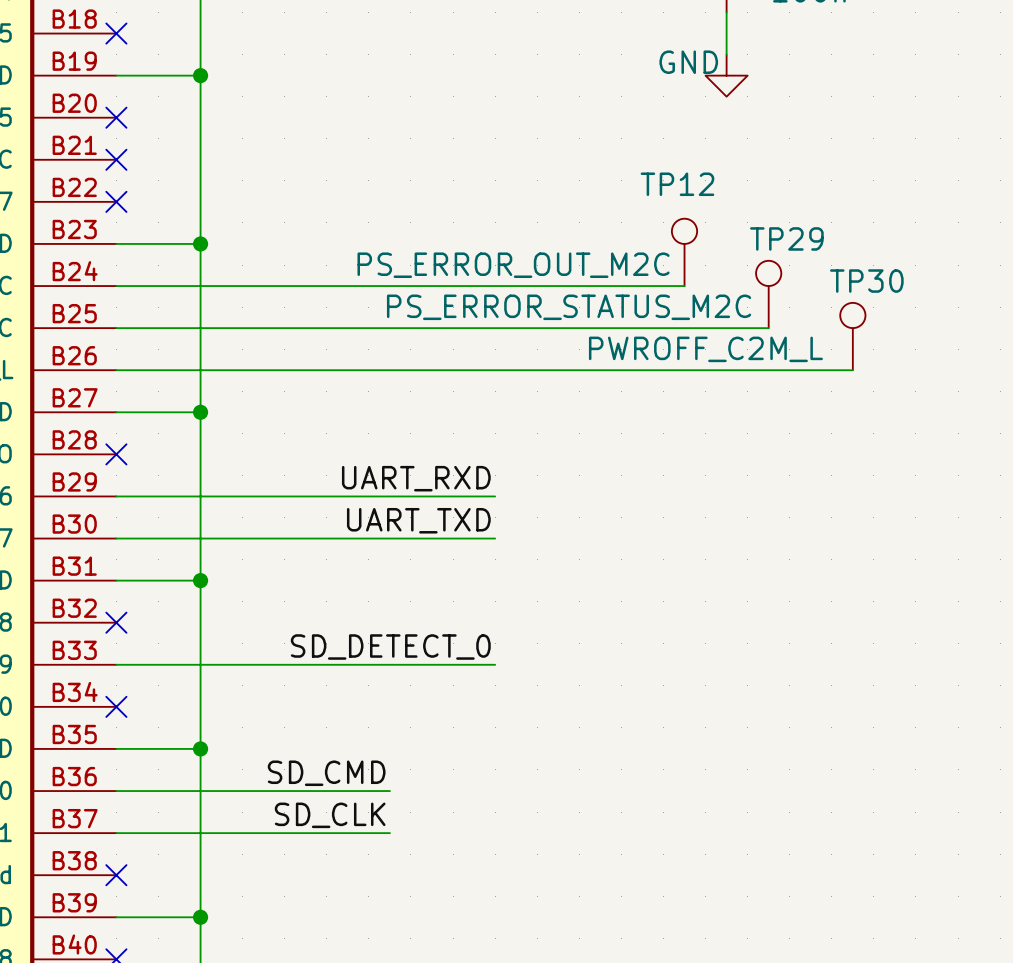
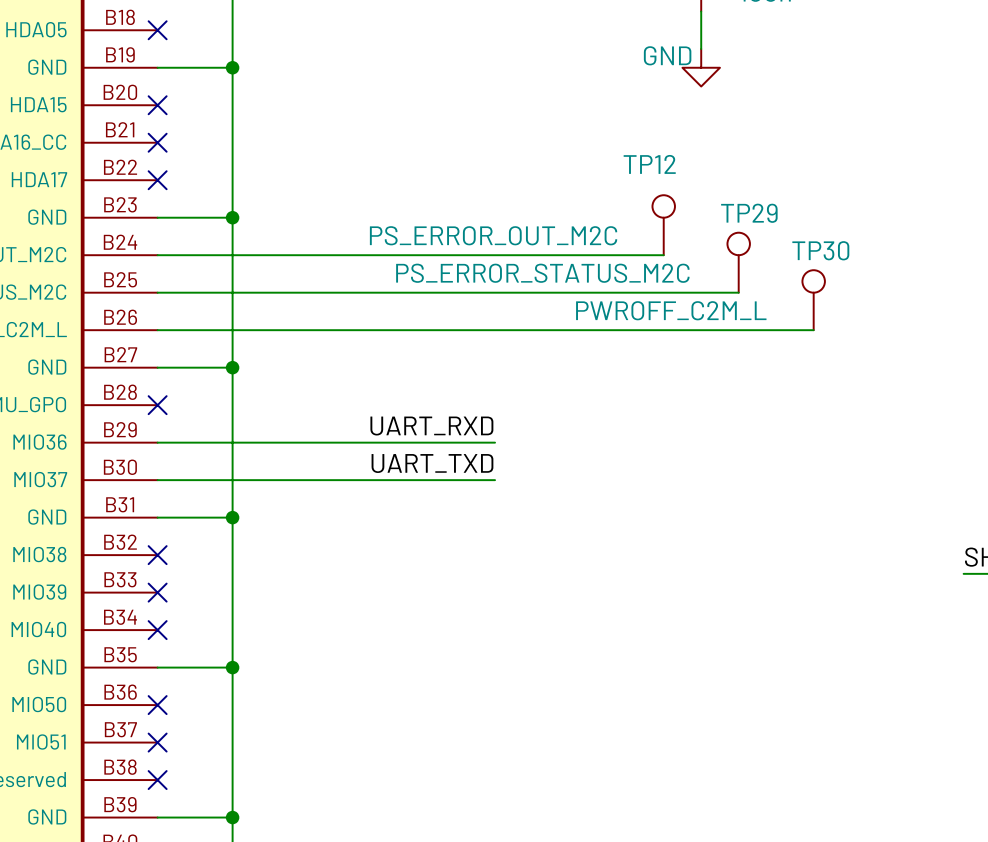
label: SD_DETECT_0 (390, 647) -> none
wire: (116, 664) (495, 664) -> none
no-connect mark: none -> (157, 592)
label: SD_CMD (326, 773) -> none
wire: (116, 791) (389, 791) -> none
no-connect mark: none -> (157, 705)
label: SD_CLK (330, 815) -> none
wire: (116, 833) (389, 833) -> none
no-connect mark: none -> (157, 742)

